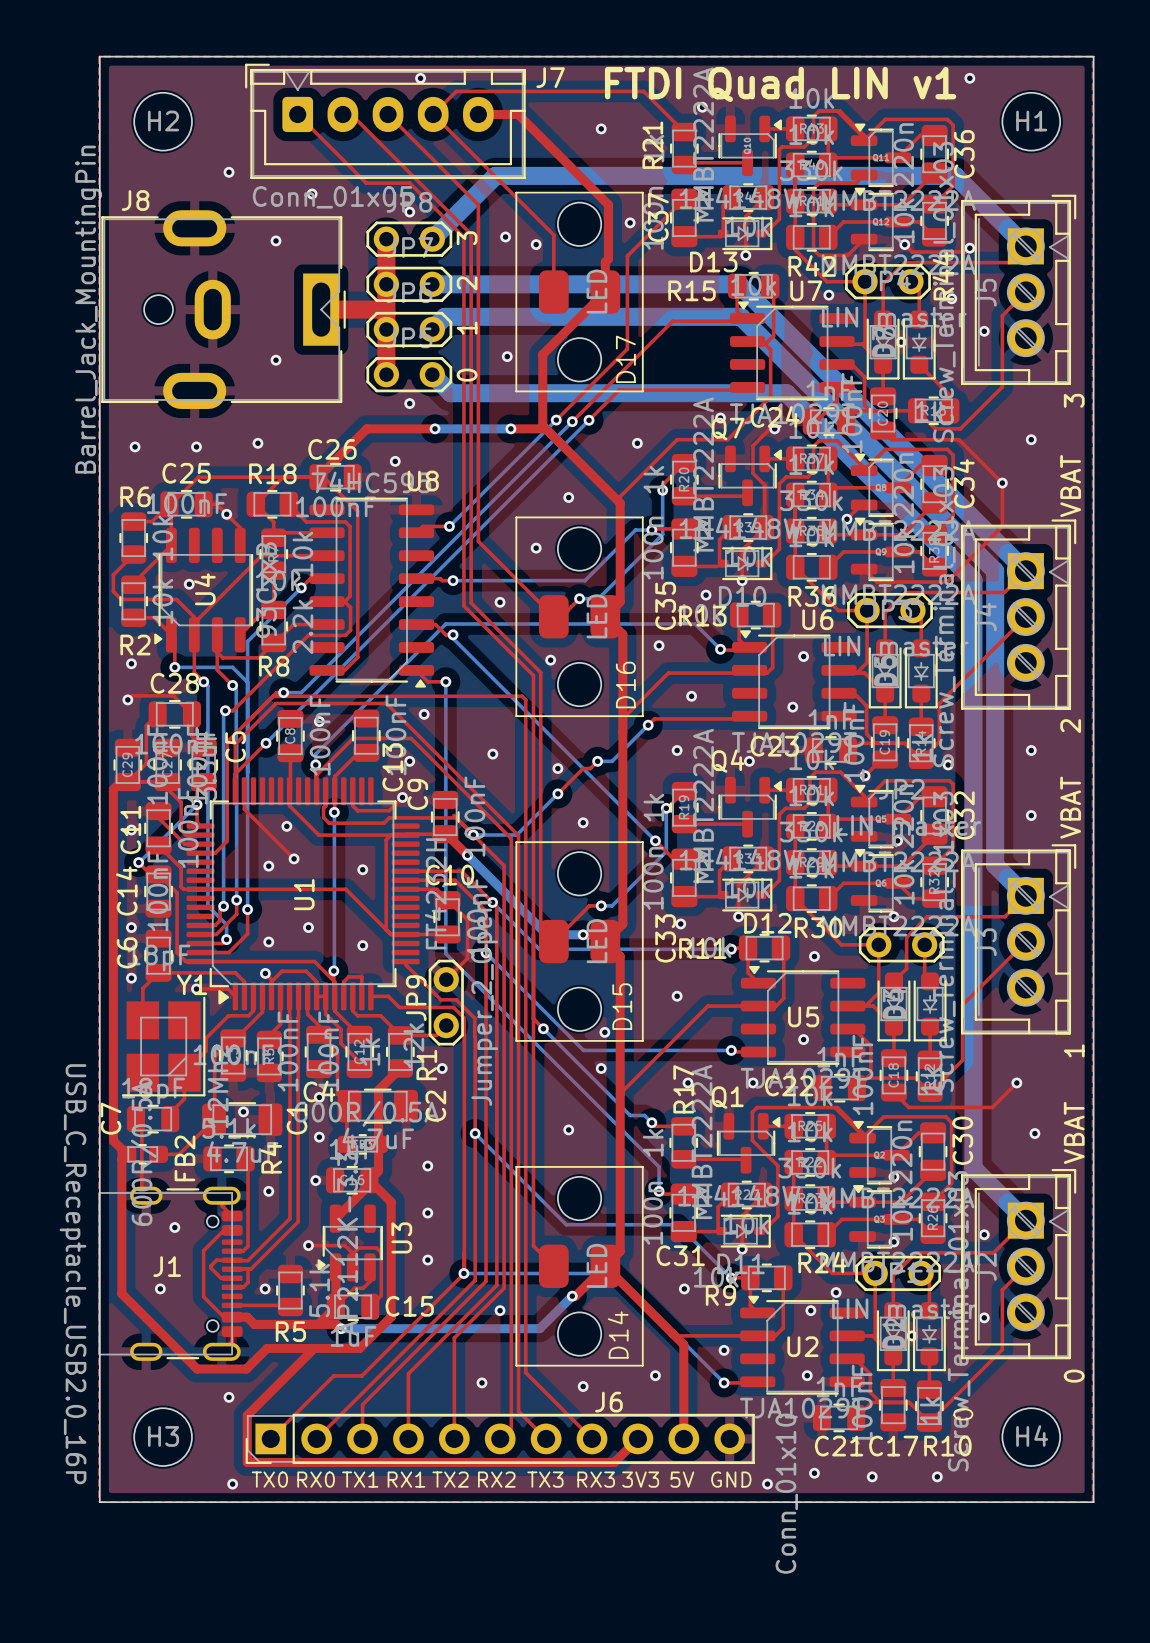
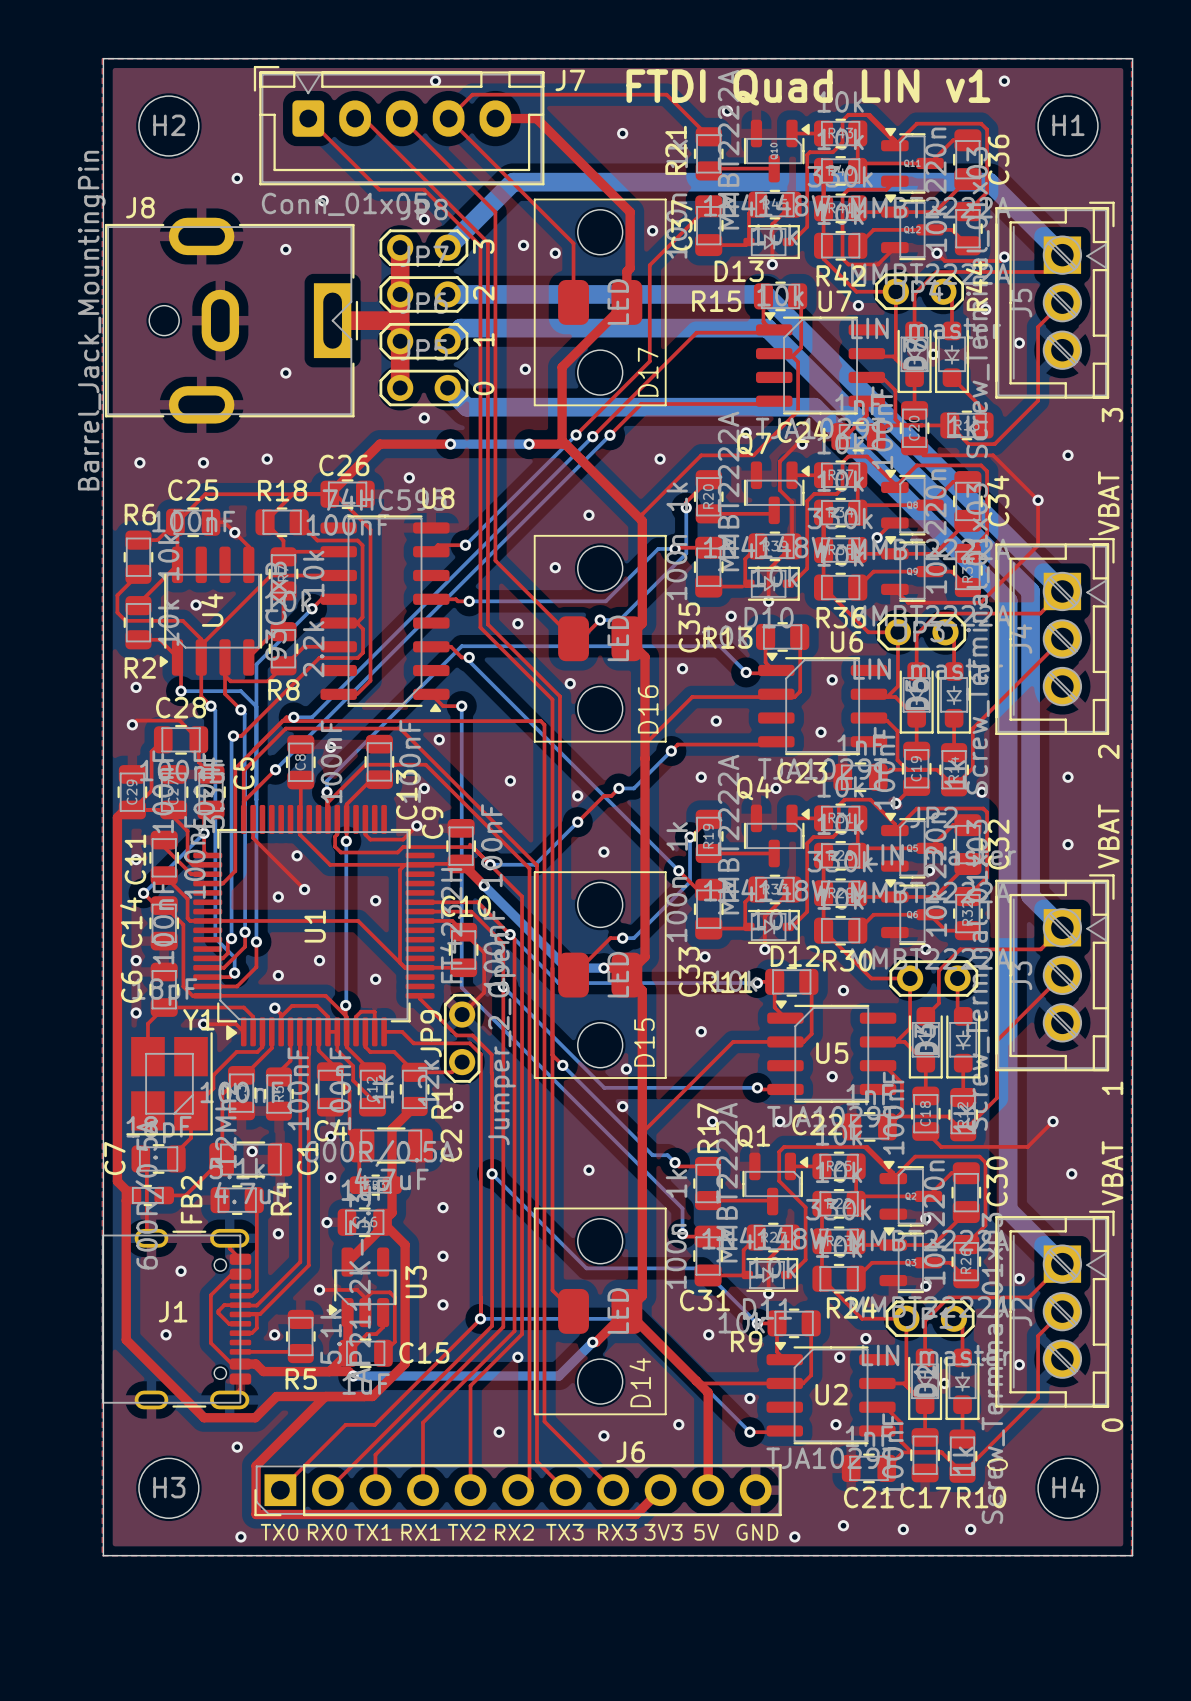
J1 value: USB_C_Receptacle_USB2.0_16P (73, 1274) -> none
J6 value: Conn_01x10 (786, 1493) -> none

